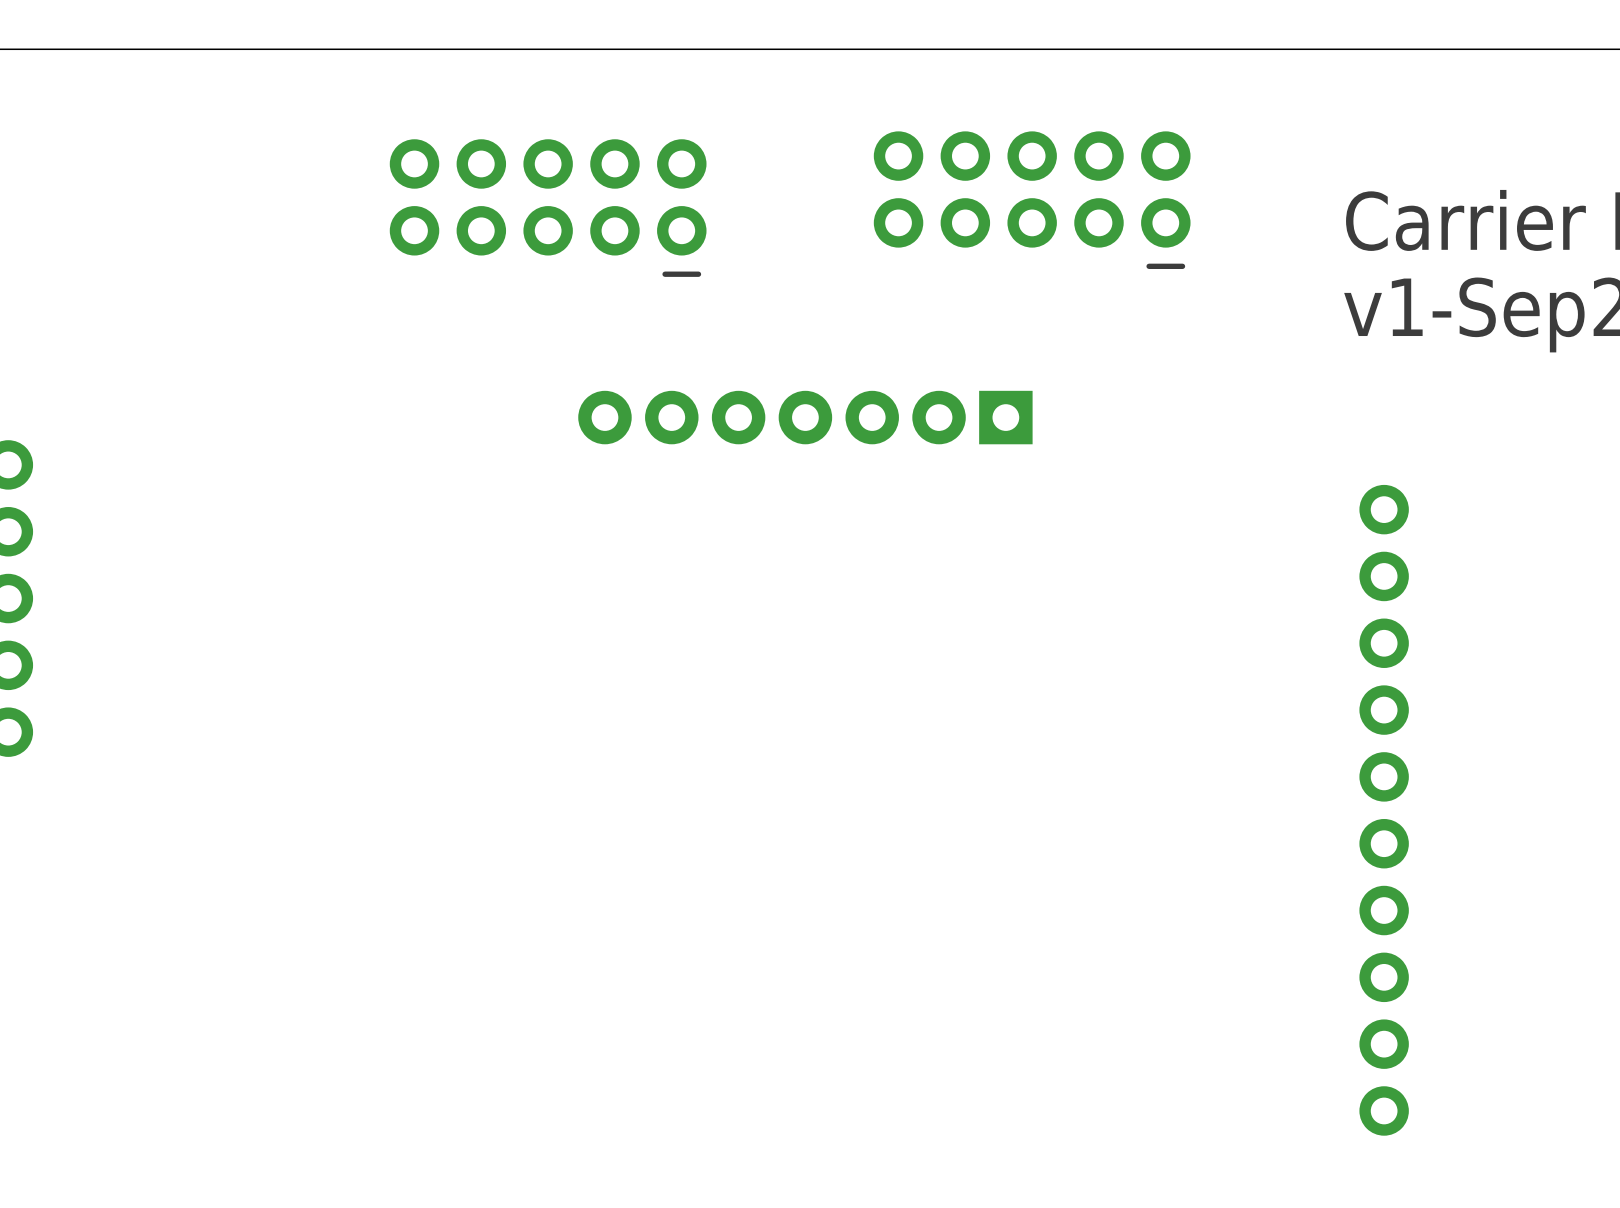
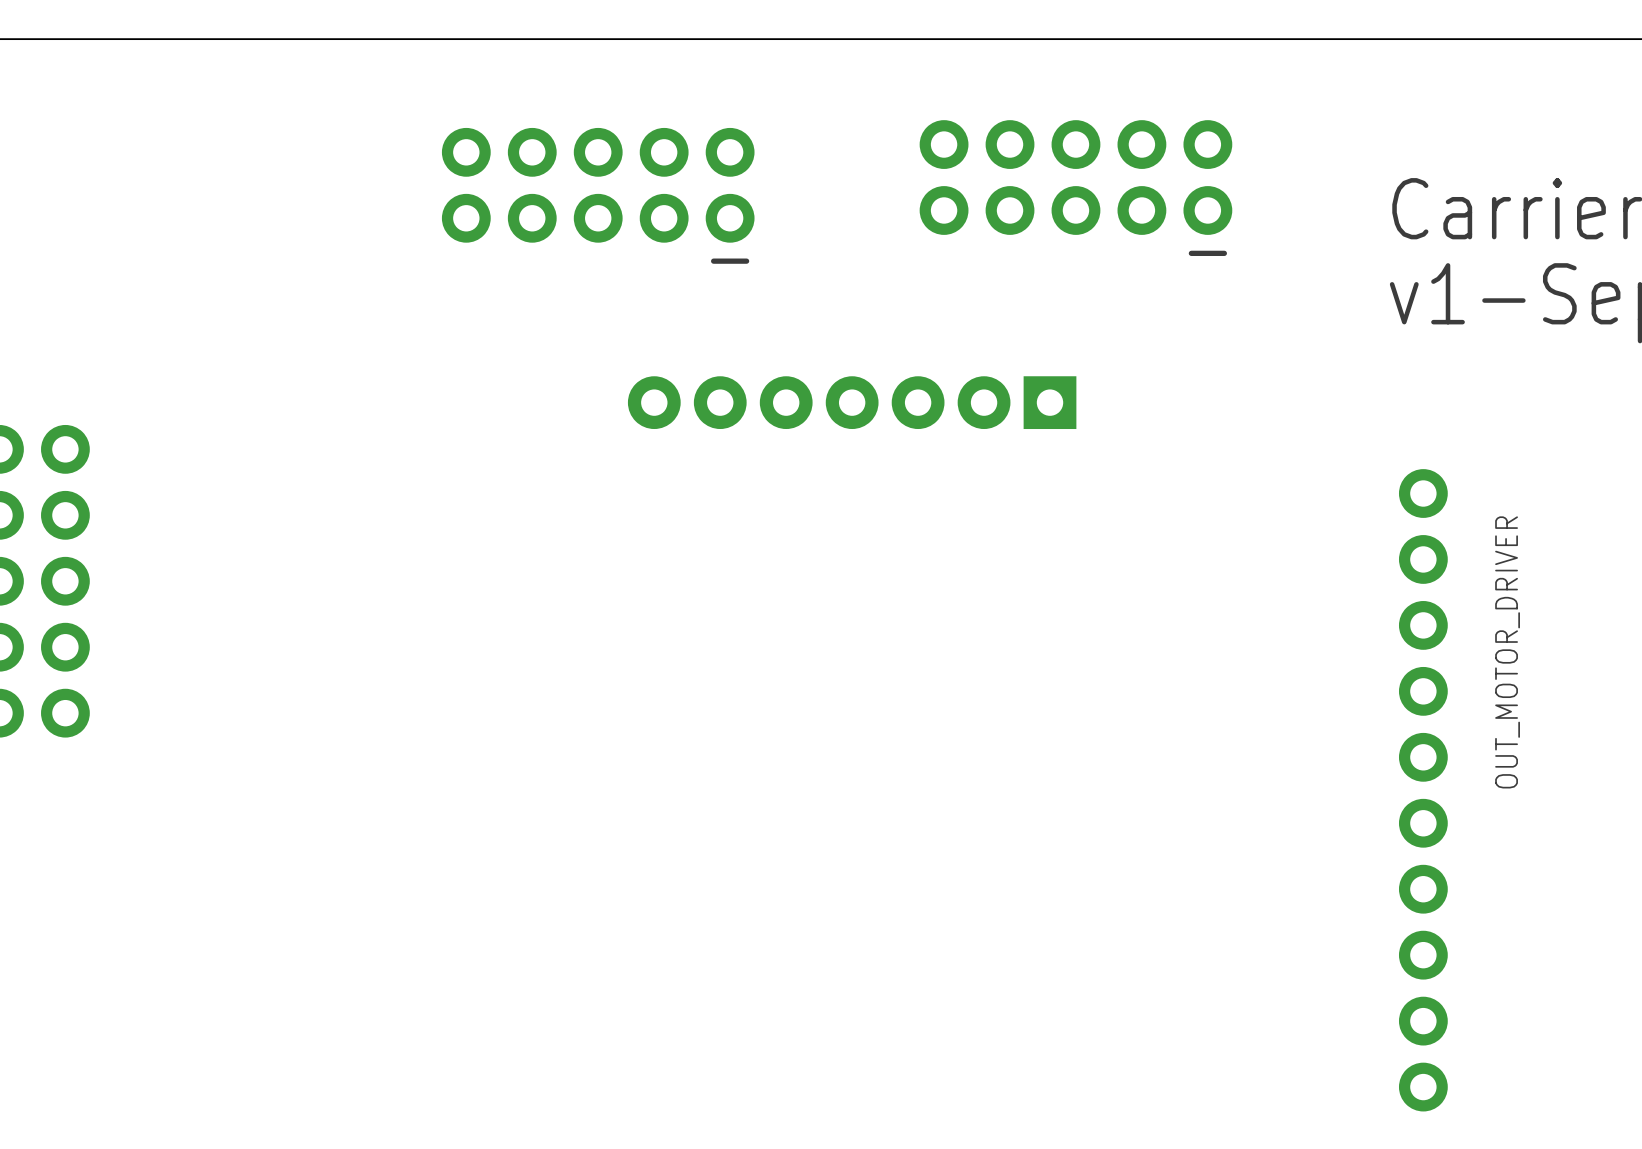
OUT_MOTOR_DRIVER name: none -> OUT_MOTOR_DRIVER (1507, 652)

